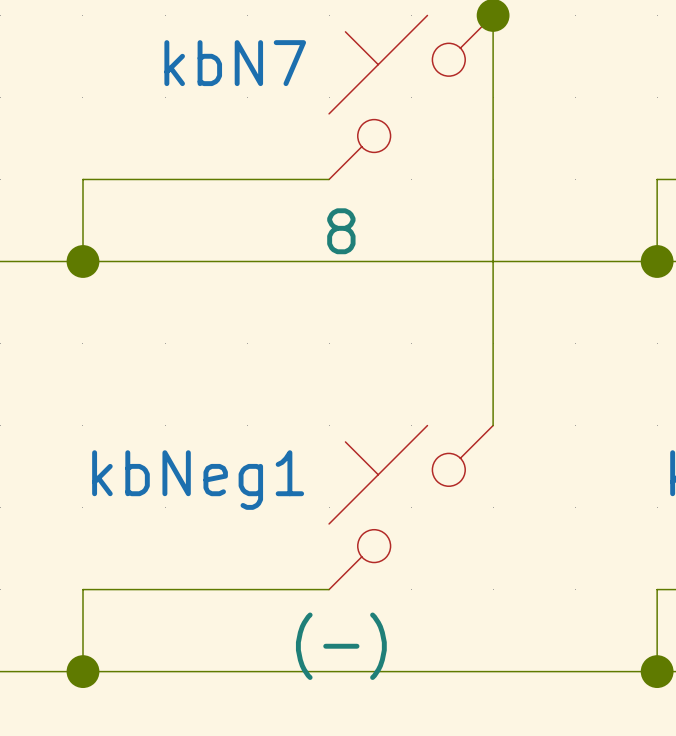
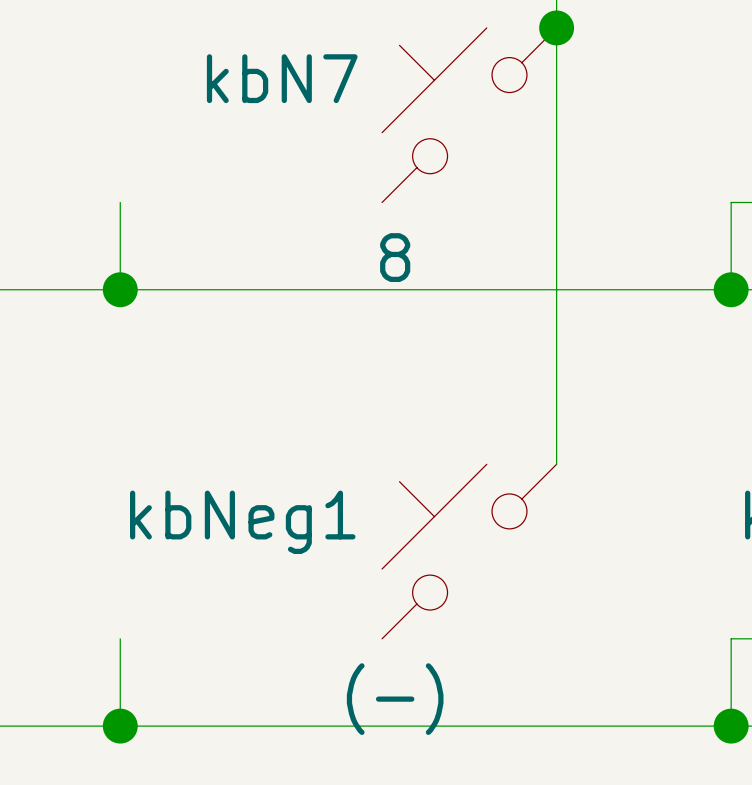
wire: (82, 179) (329, 179) -> none
wire: (82, 589) (329, 589) -> none

